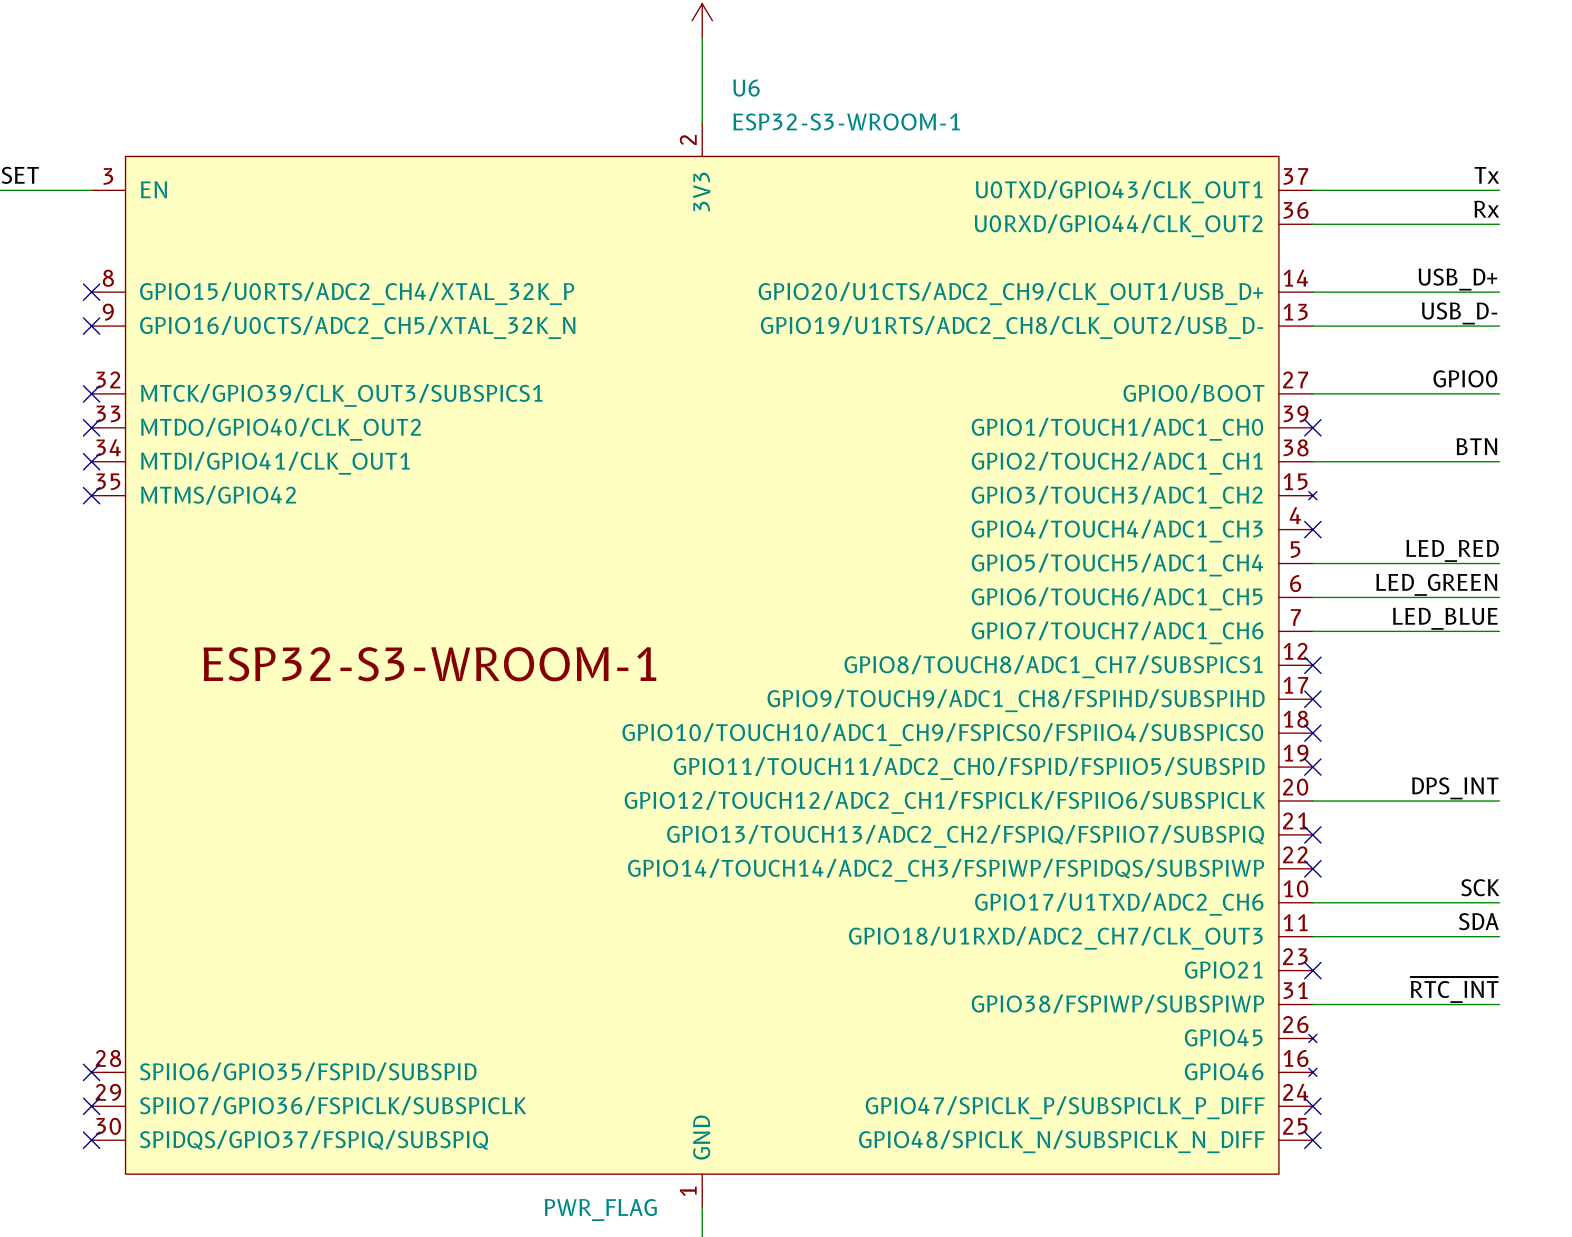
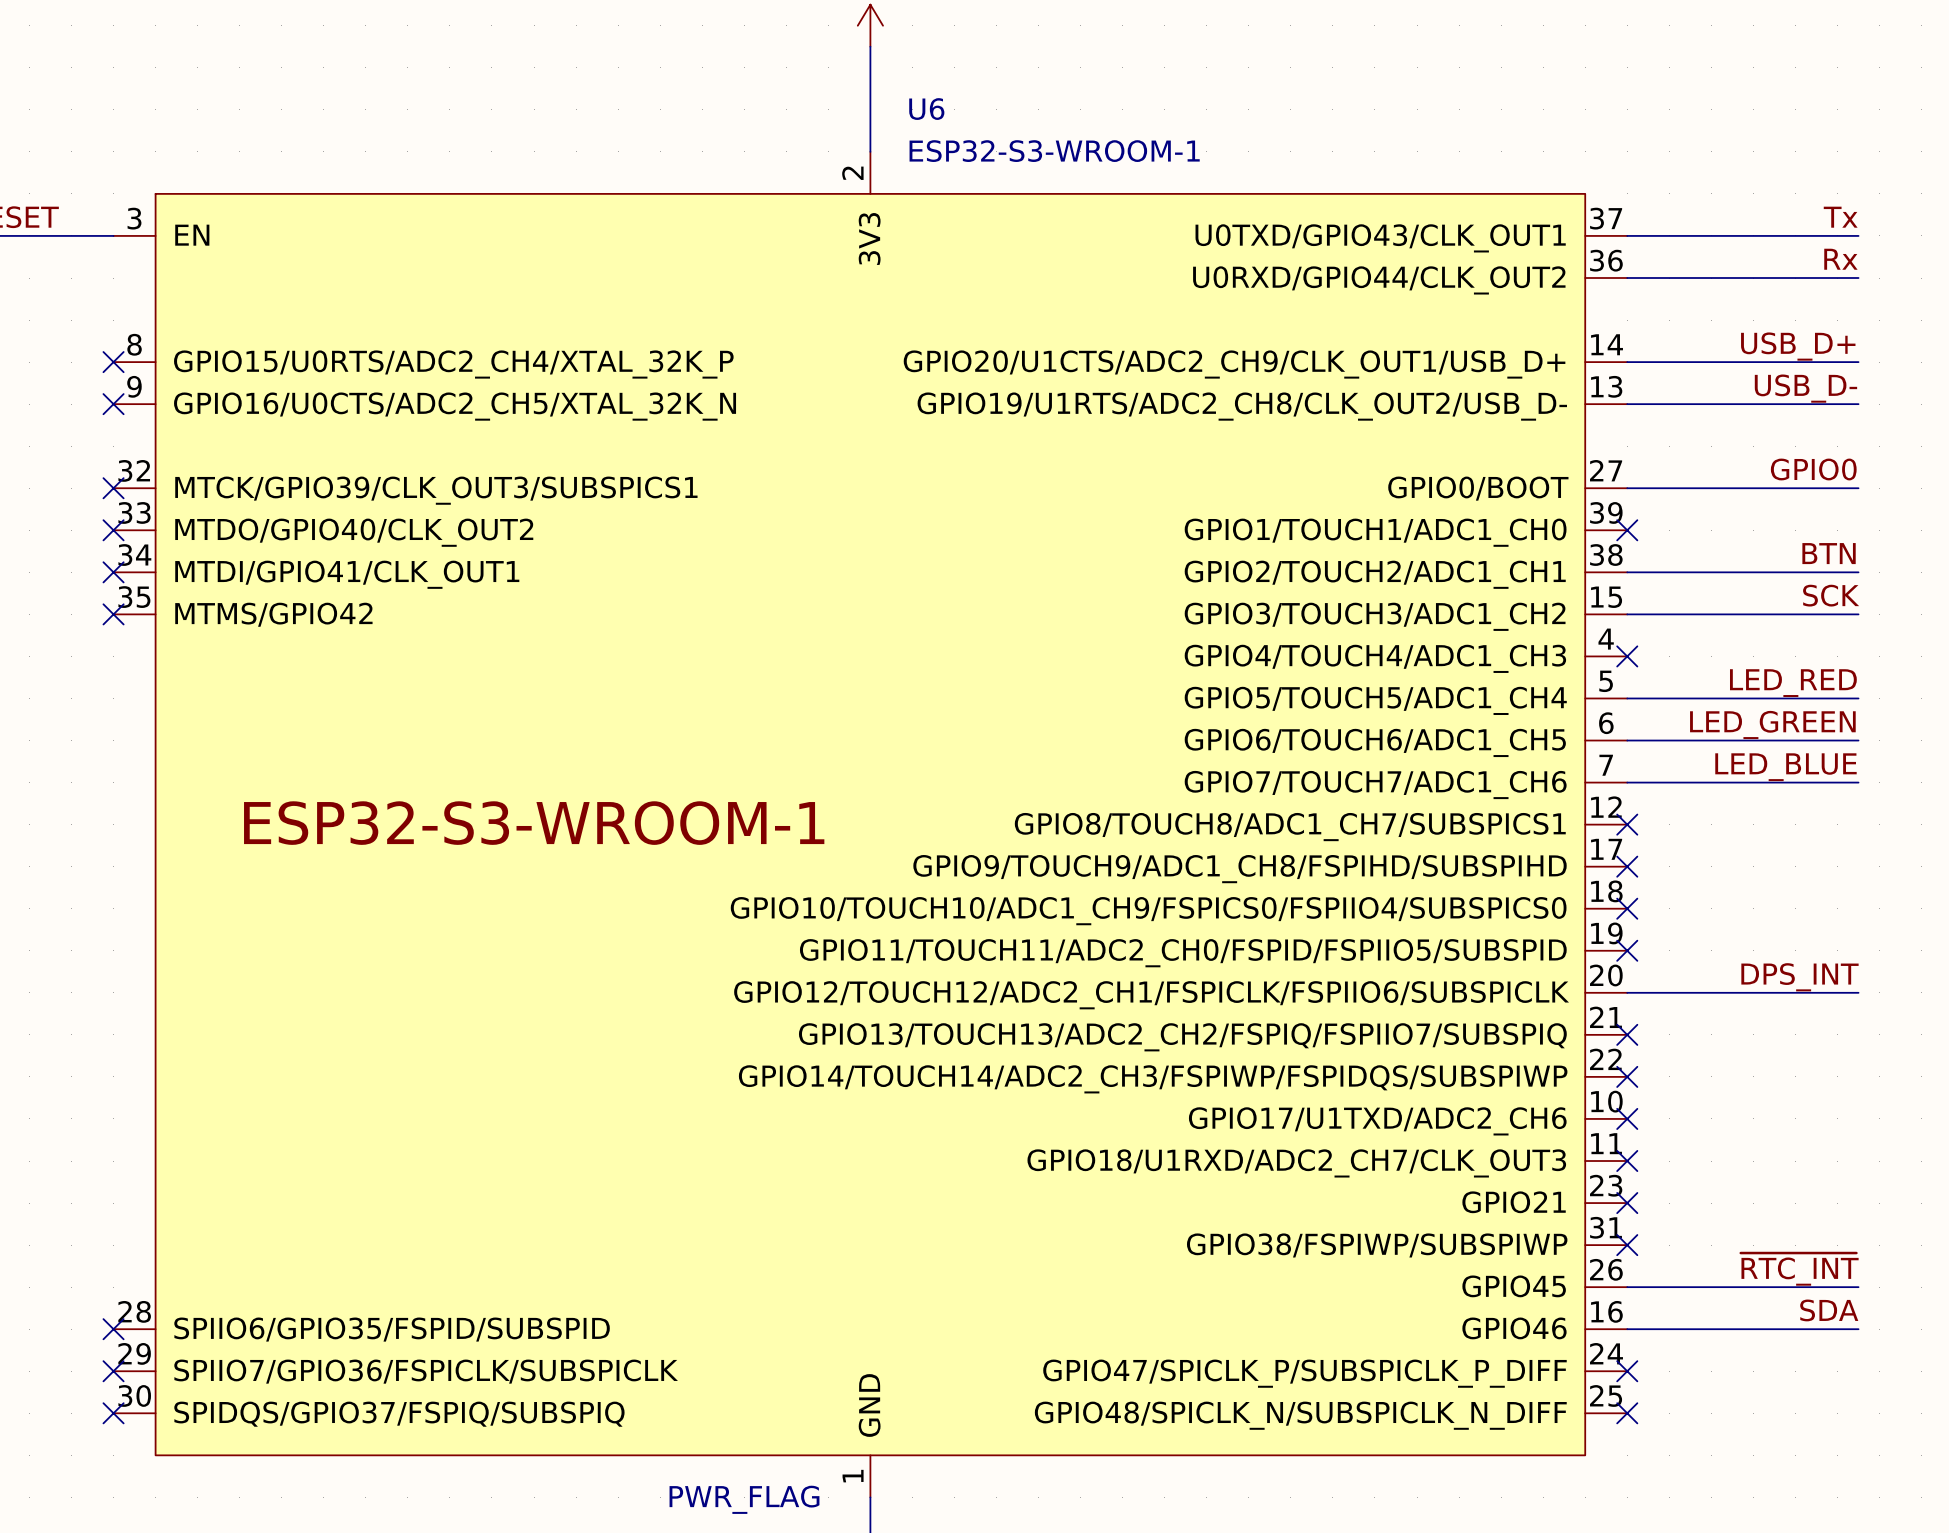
U6 symbol: [91, 122, 1317, 1209] -> [113, 151, 1628, 1498]
label: none -> SCK (1831, 595)
wire: none -> (1627, 614) (1858, 614)
label: SCK (1480, 887) -> none
wire: (1312, 902) (1499, 902) -> (1627, 1287) (1858, 1287)
no-connect mark: none -> (1627, 1118)
label position: SDA (1478, 921) -> SDA (1829, 1310)
wire: (1312, 936) (1499, 936) -> (1627, 1329) (1858, 1329)
no-connect mark: none -> (1627, 1161)
label position: ~{RTC_INT} (1454, 989) -> ~{RTC_INT} (1799, 1269)
wire: (1312, 1004) (1499, 1004) -> none
no-connect mark: none -> (1627, 1245)

